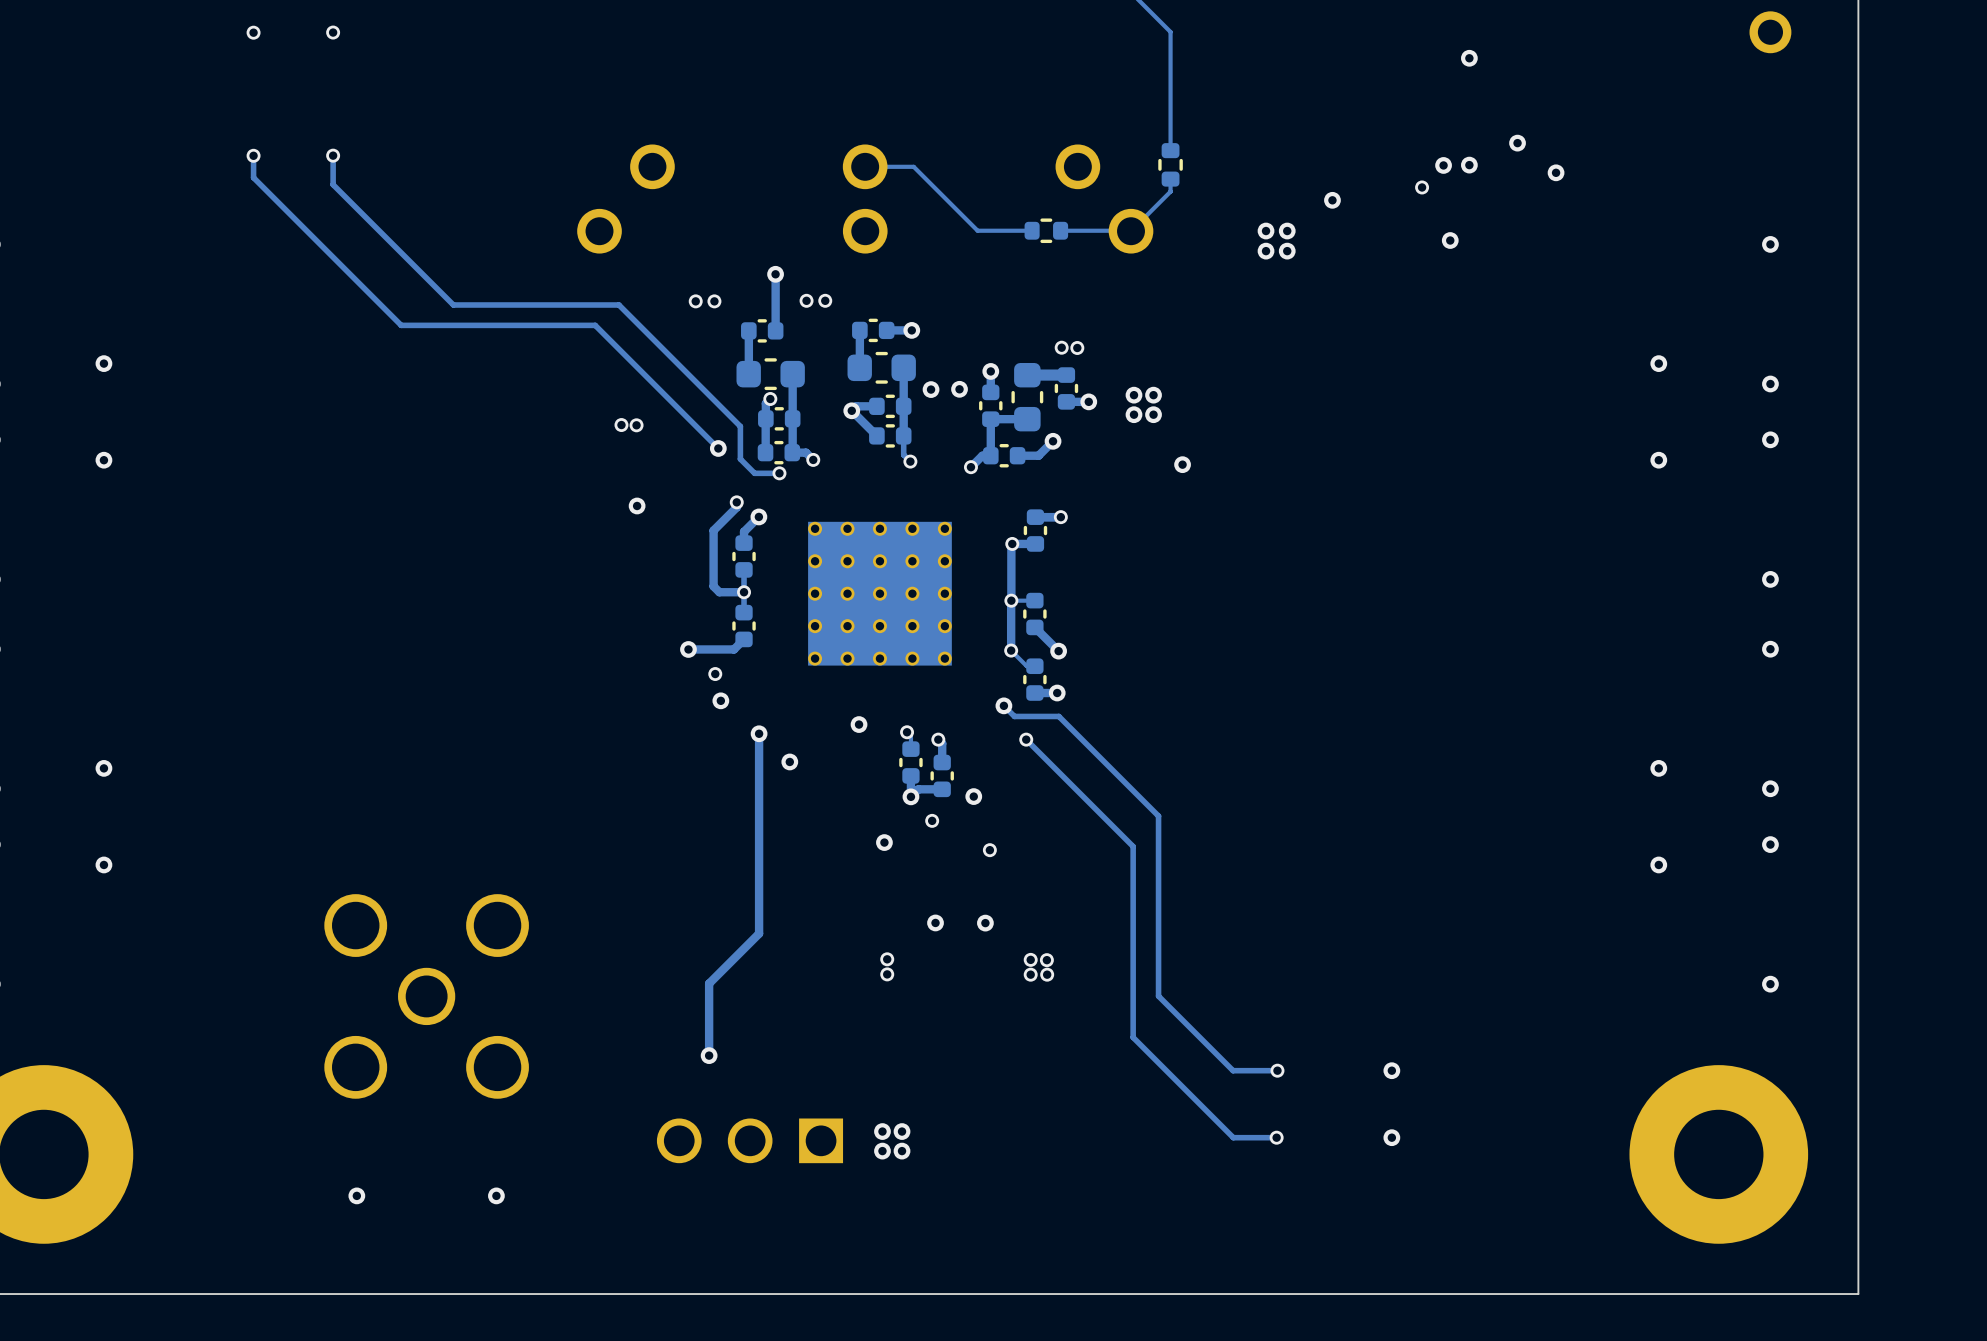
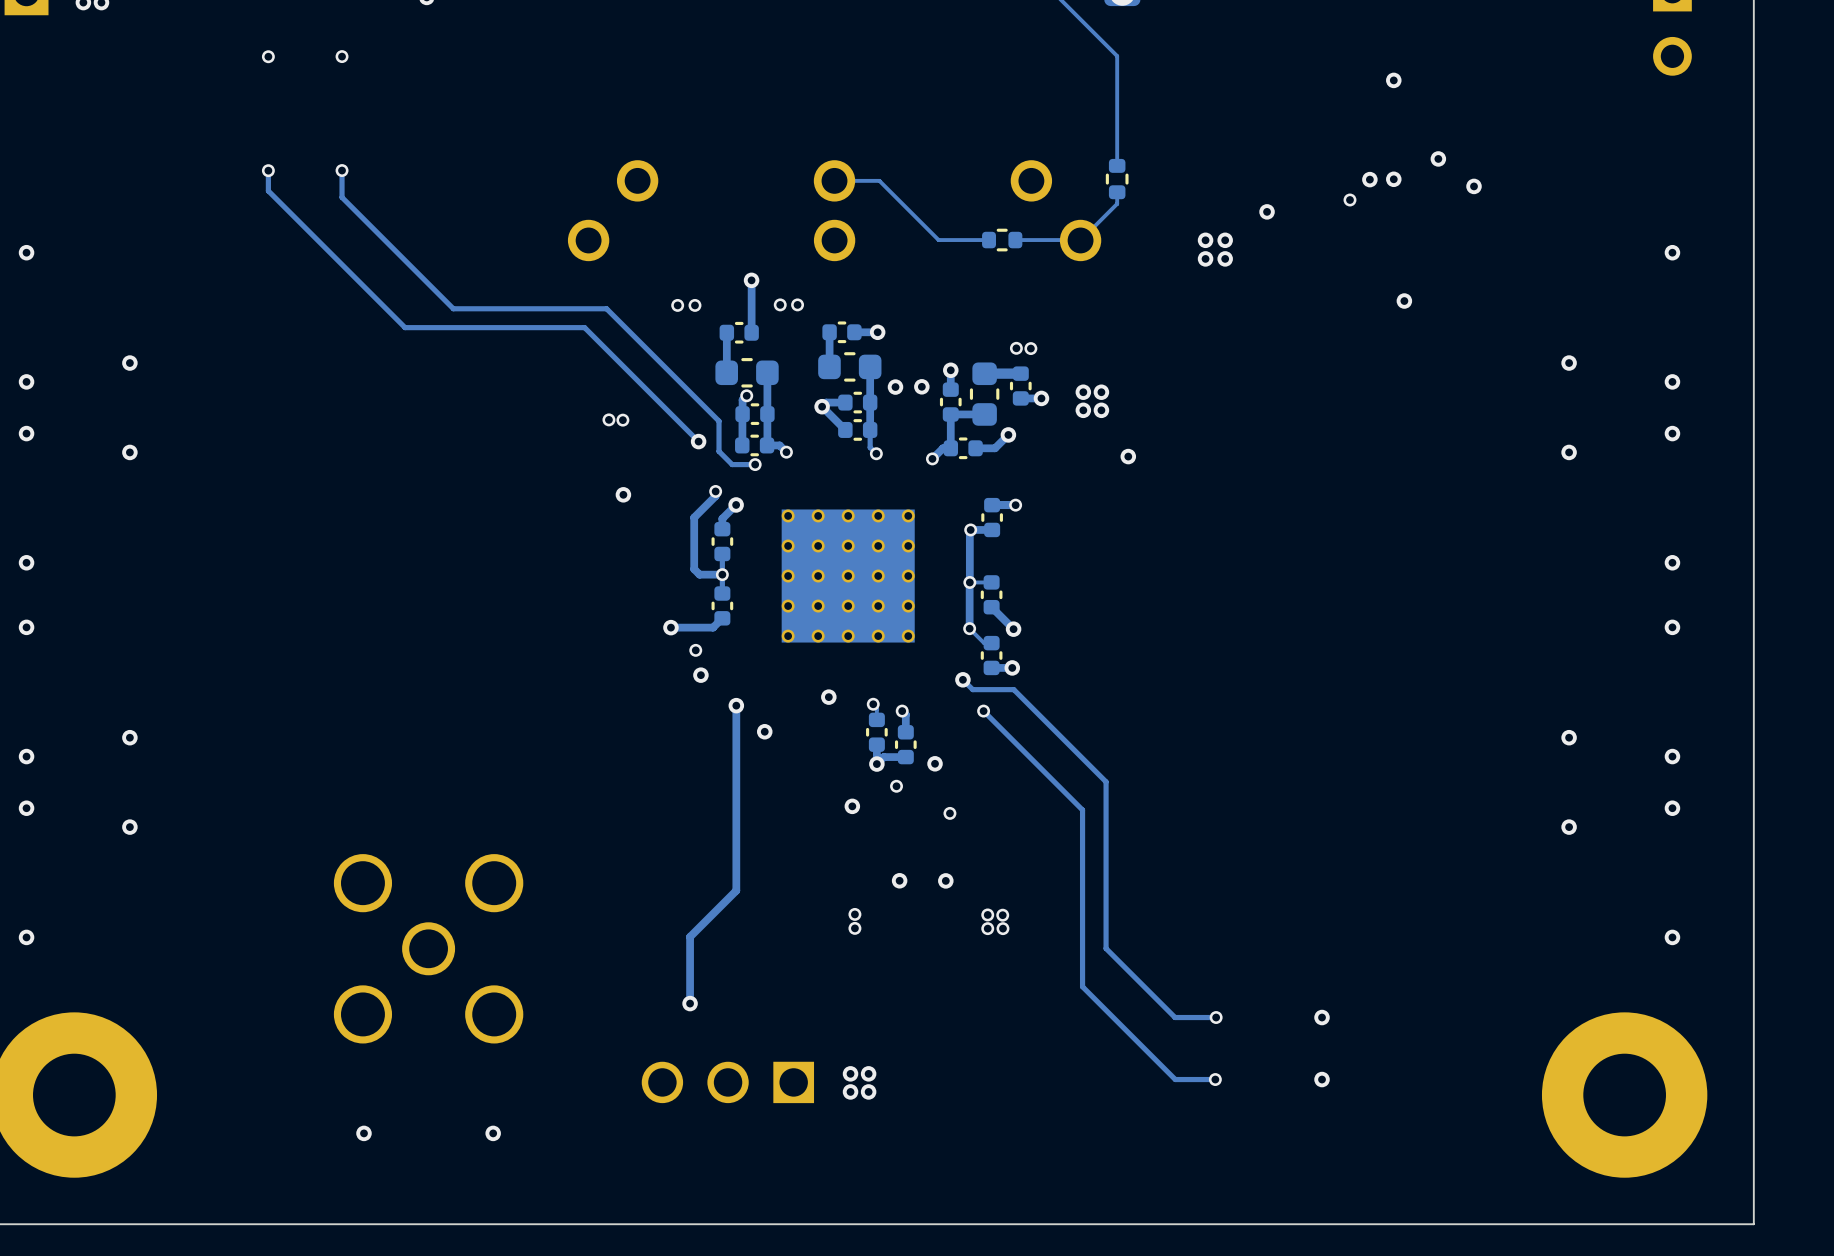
via position: (1450, 240) -> (1404, 301)

